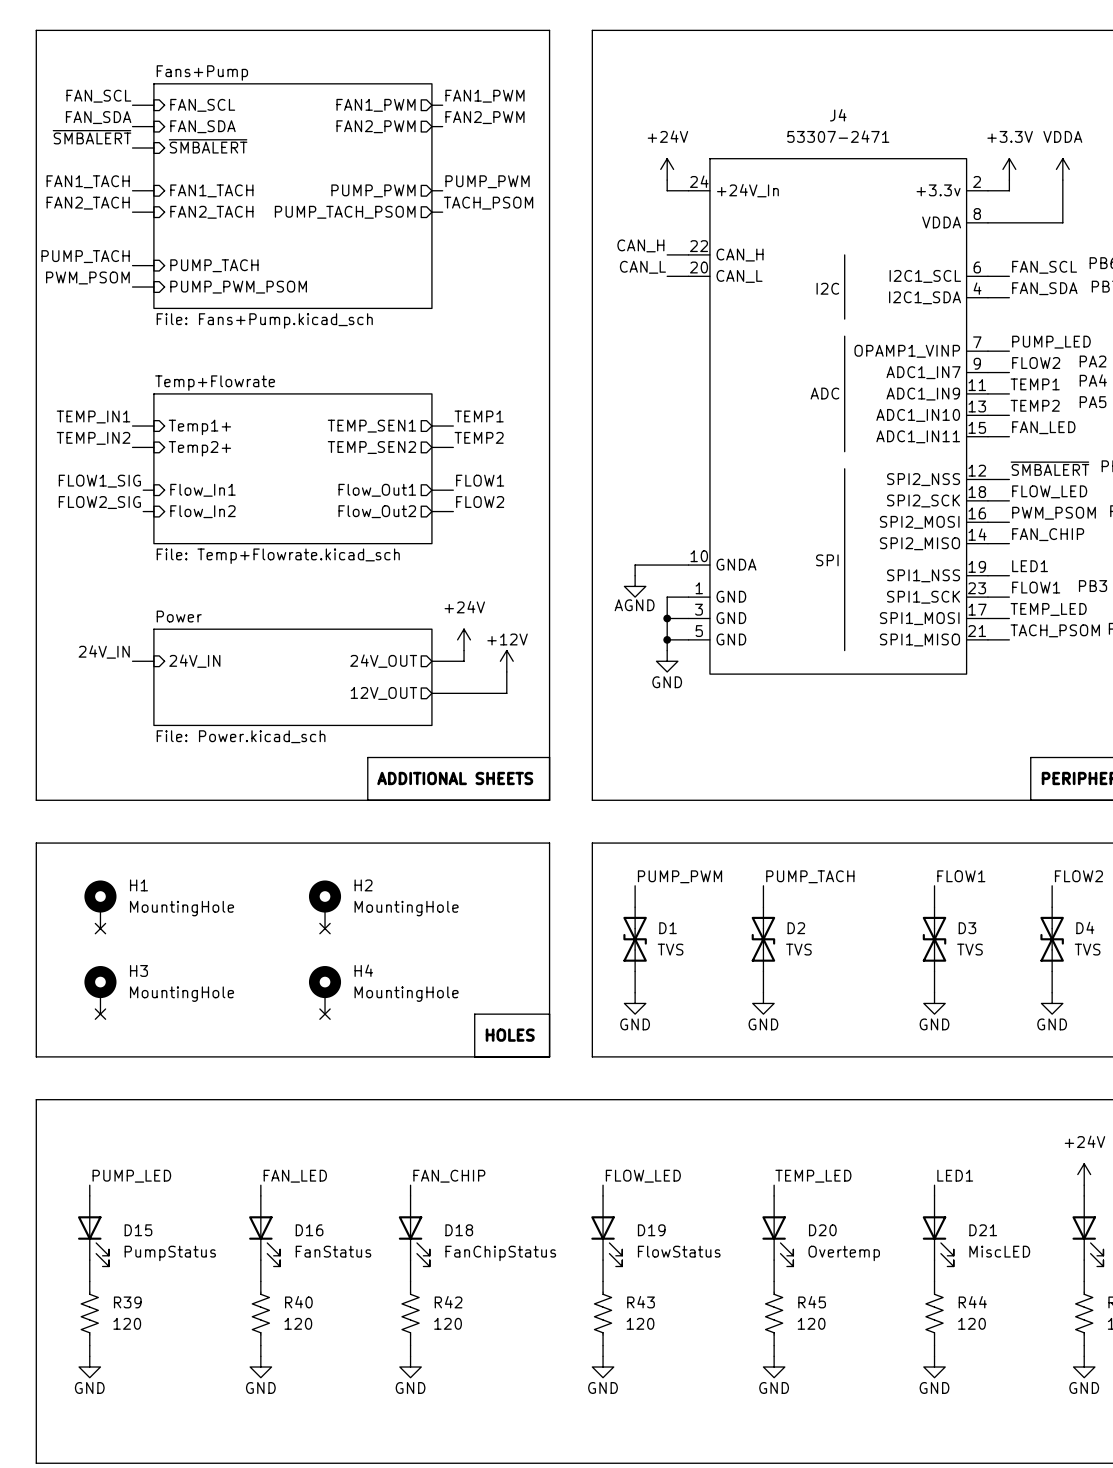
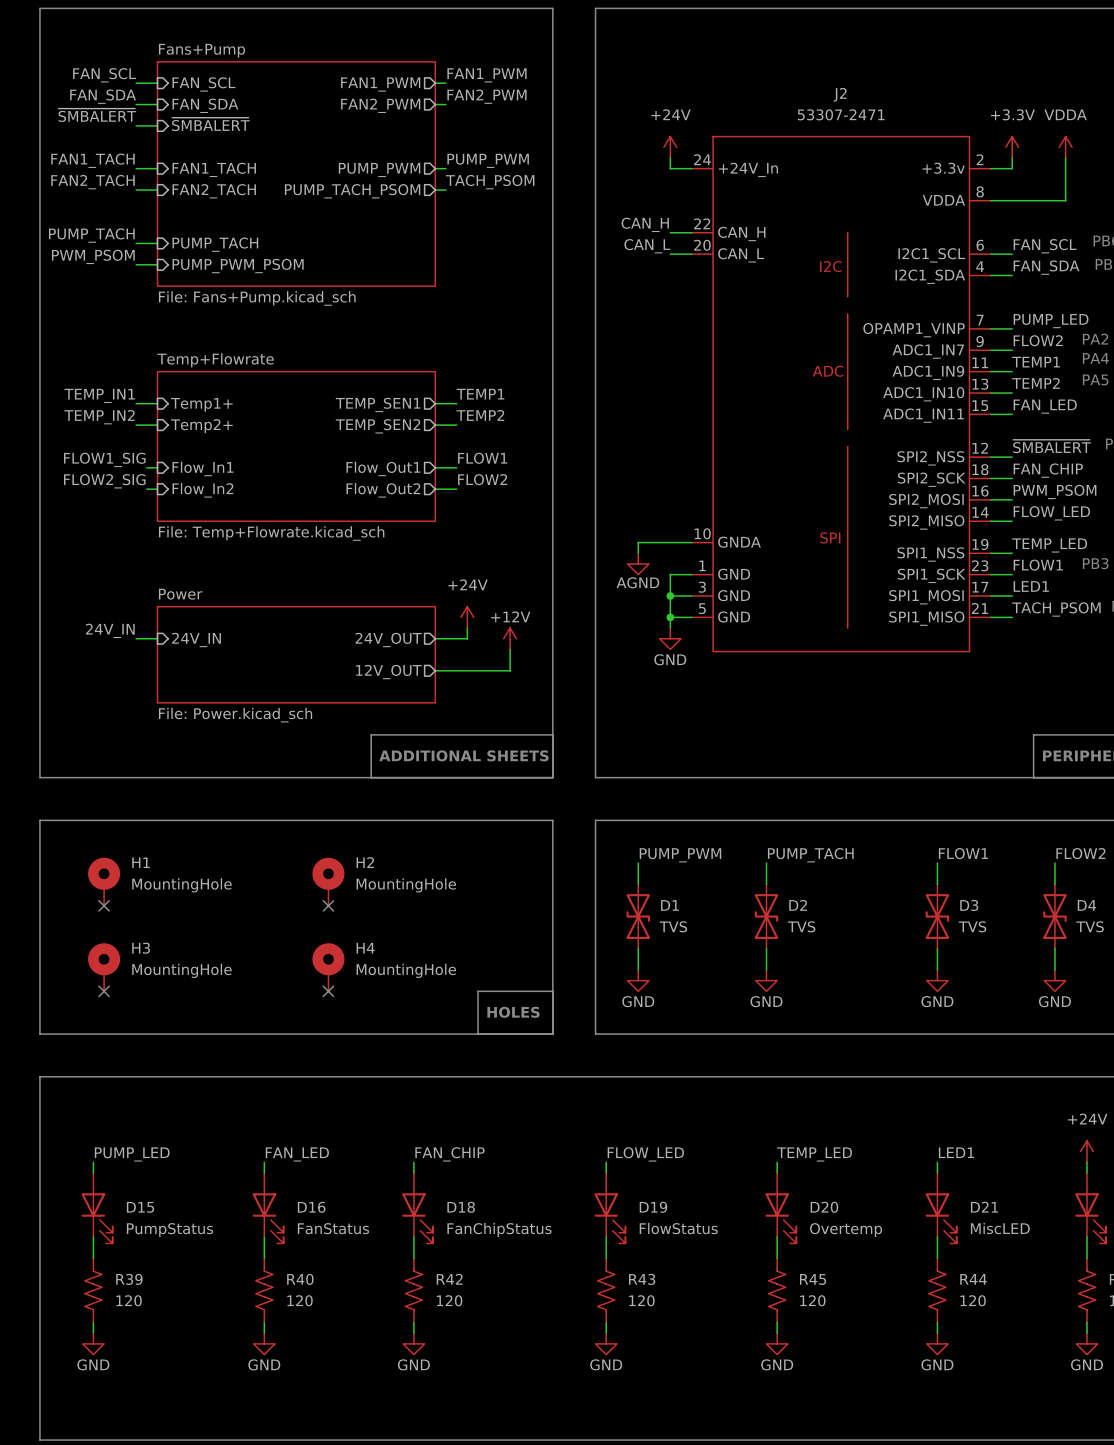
J4 name: J4 (838, 115) -> J2 (840, 94)
label: FLOW_LED (1049, 491) -> FAN_CHIP (1048, 470)
label: FAN_CHIP (1048, 534) -> FLOW_LED (1051, 513)
label: LED1 (1030, 566) -> TEMP_LED (1049, 545)
label: TEMP_LED (1048, 609) -> LED1 (1031, 586)

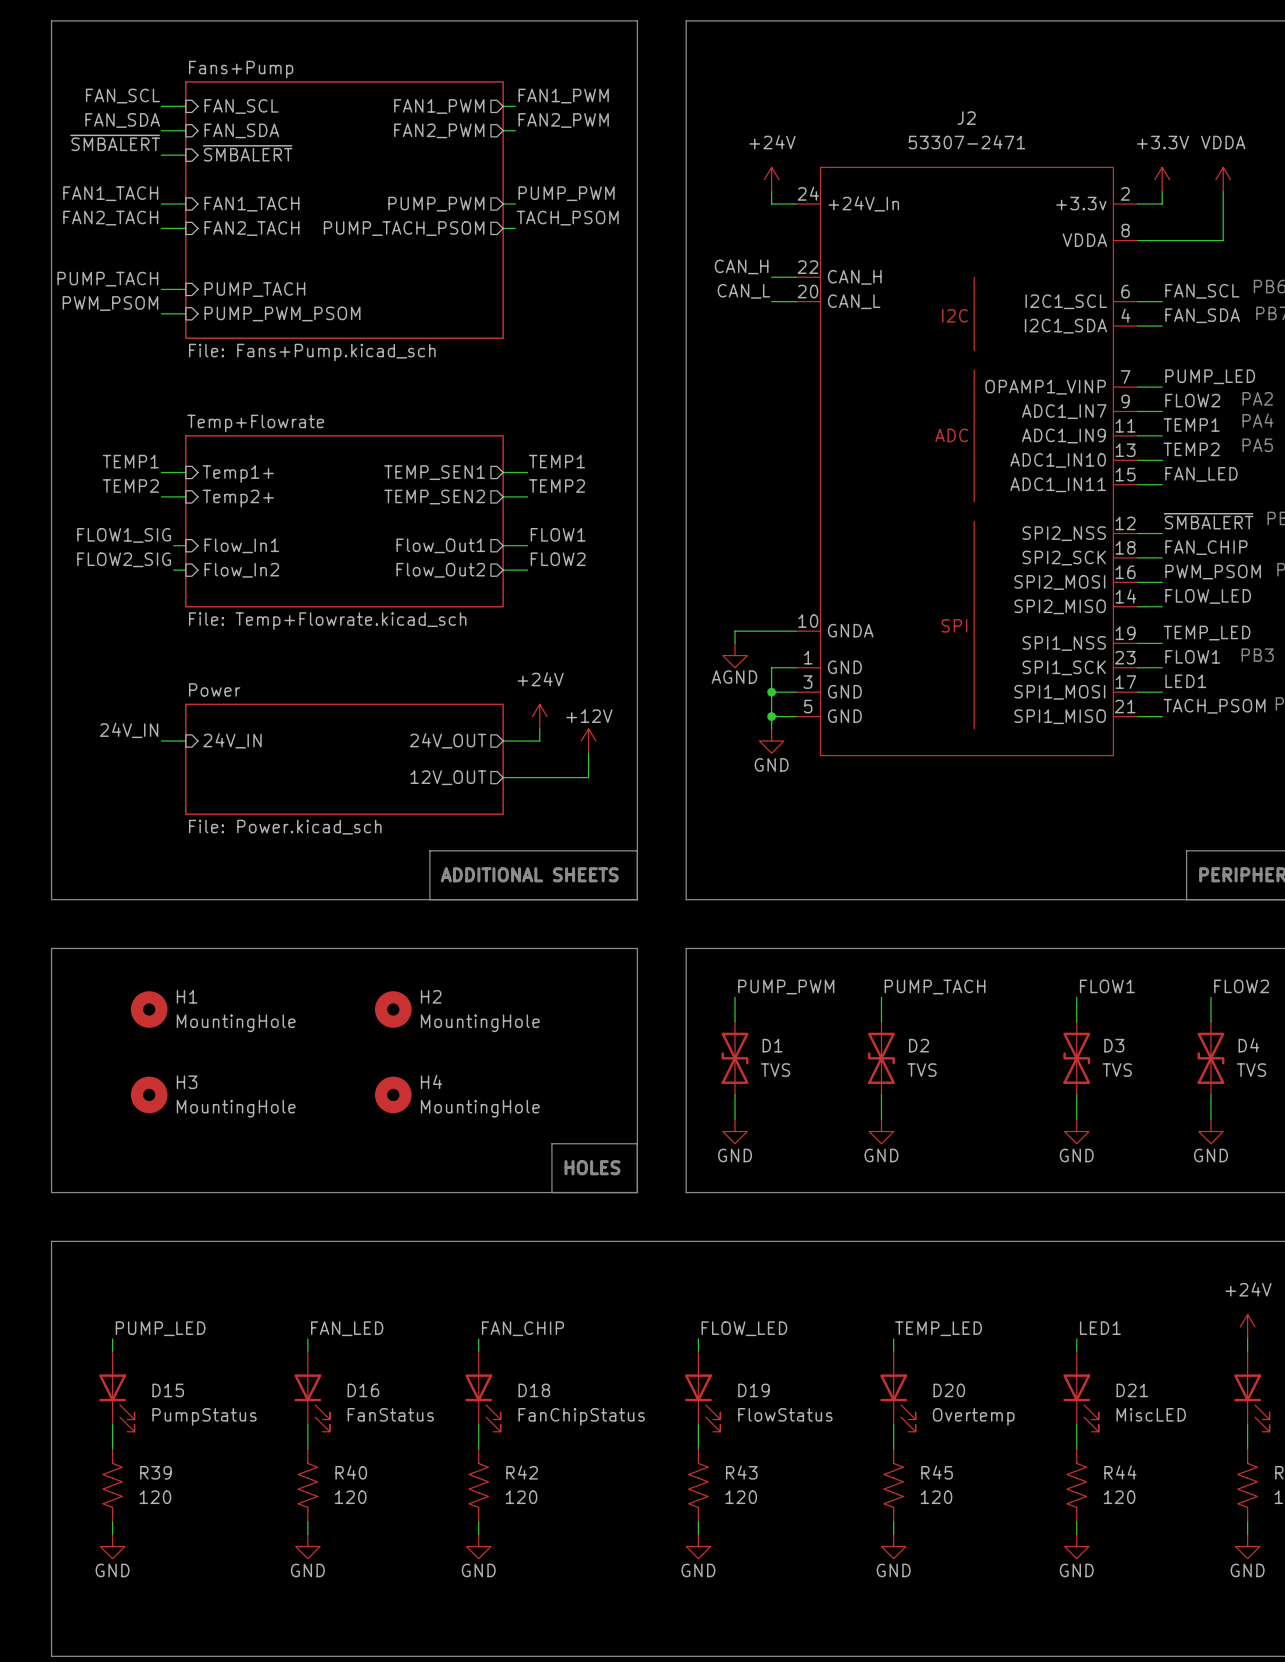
label: TEMP_IN1 (99, 395) -> TEMP1 (130, 461)
label: TEMP_IN2 (99, 417) -> TEMP2 (130, 486)
H1 symbol: [88, 857, 121, 906] -> [130, 991, 168, 1028]
H2 symbol: [312, 857, 345, 906] -> [374, 991, 412, 1028]
no-connect mark: (104, 905) -> none
no-connect mark: (328, 905) -> none
H3 symbol: [88, 943, 121, 992] -> [130, 1076, 168, 1114]
H4 symbol: [312, 943, 345, 992] -> [374, 1076, 412, 1114]
no-connect mark: (104, 991) -> none
no-connect mark: (328, 991) -> none

